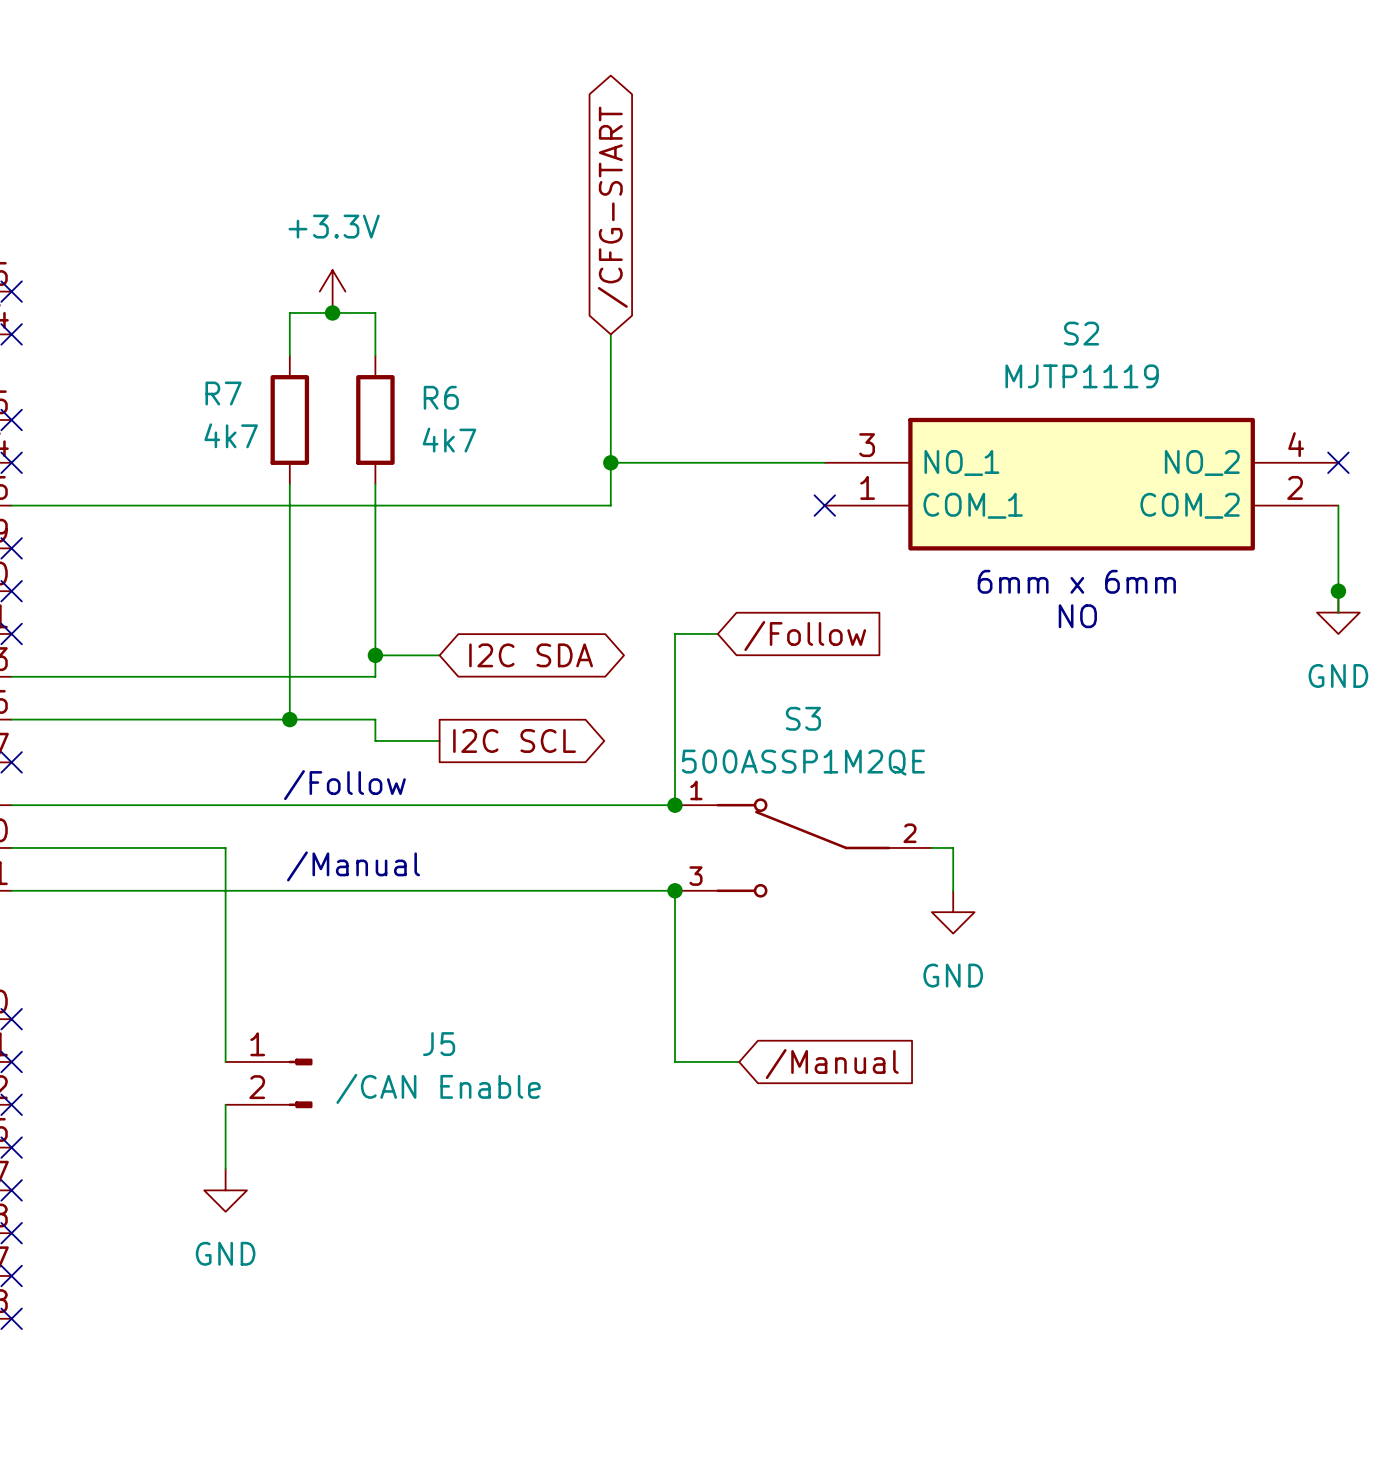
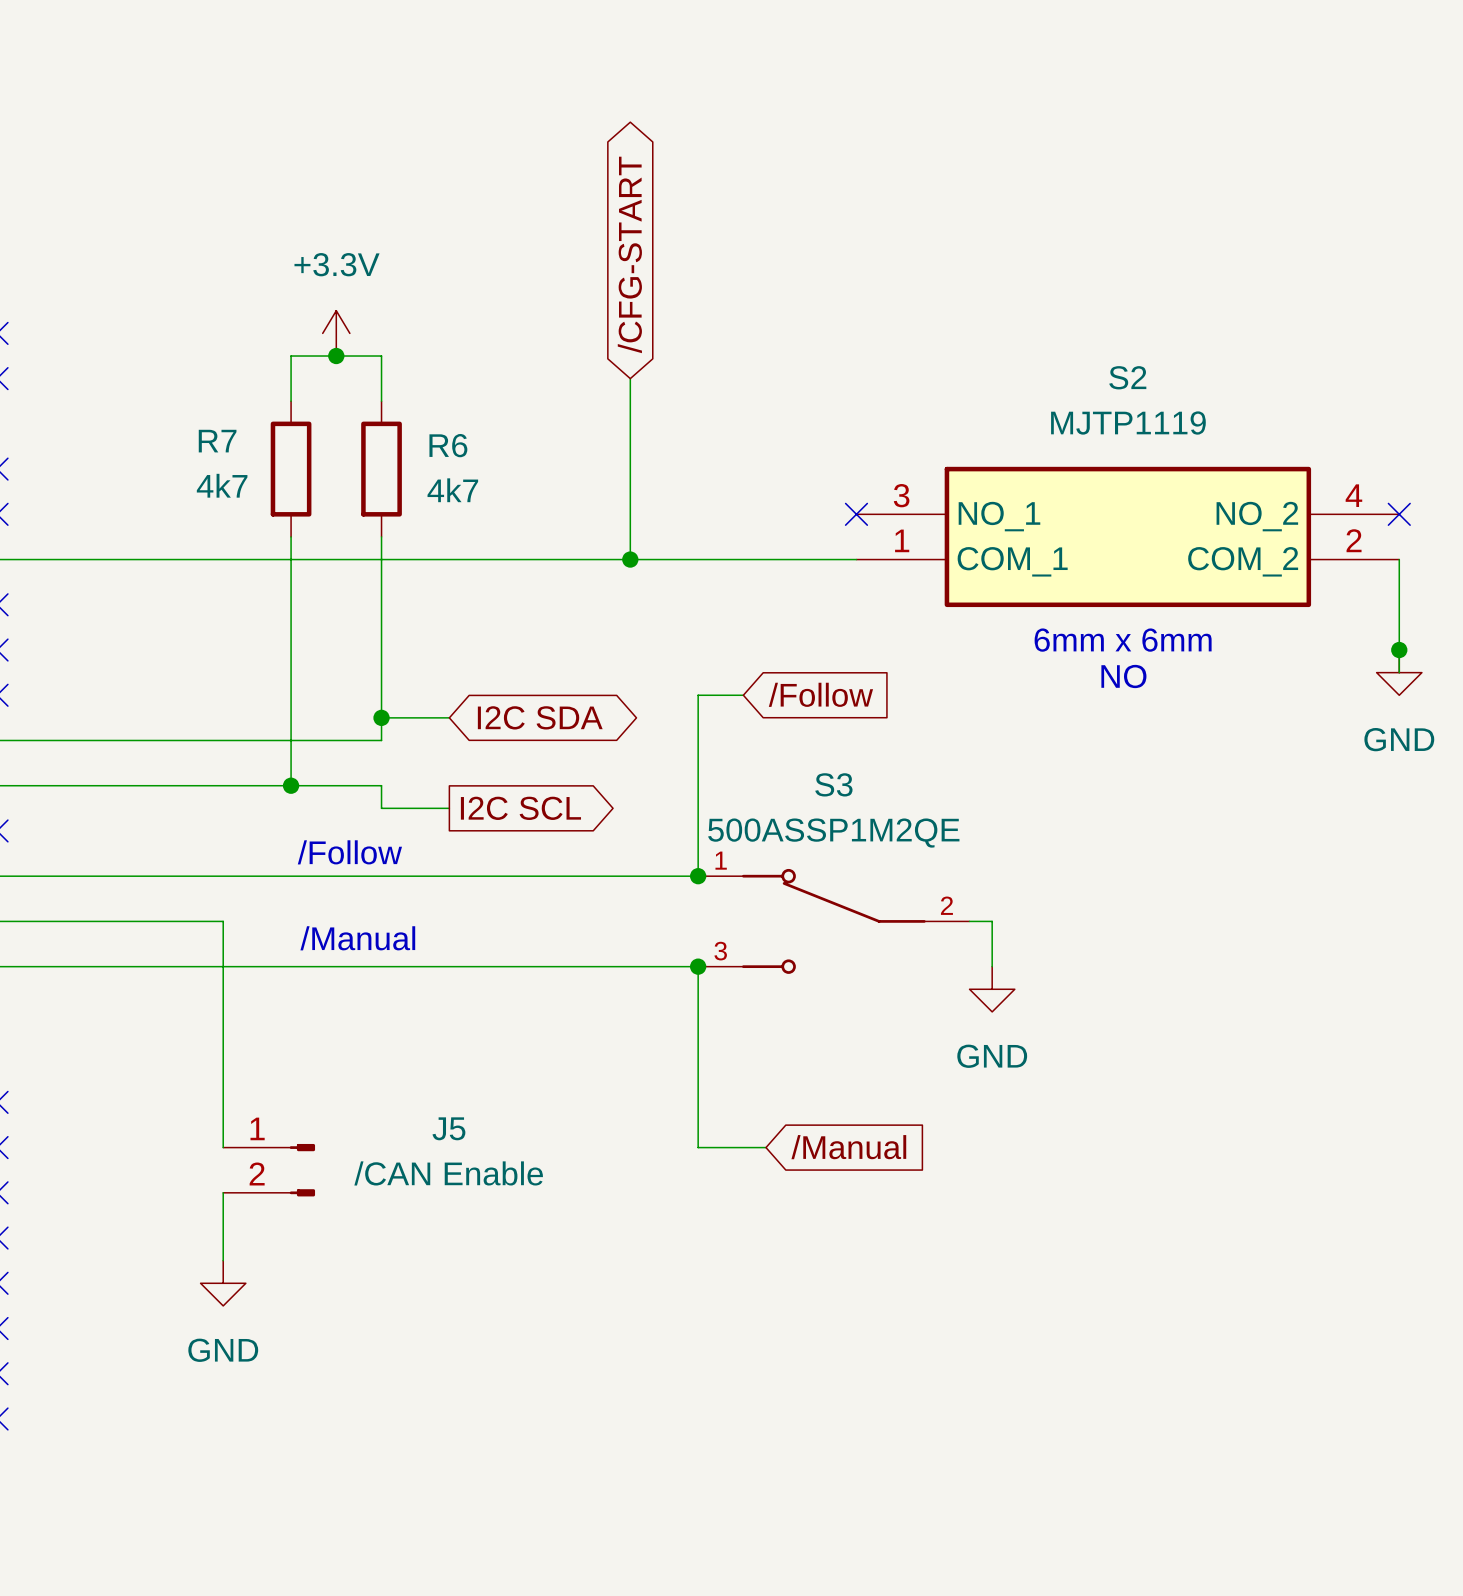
wire: (610, 462) (824, 462) -> (630, 559) (856, 559)
junction position: (610, 462) -> (630, 559)
no-connect mark position: (824, 505) -> (856, 514)

